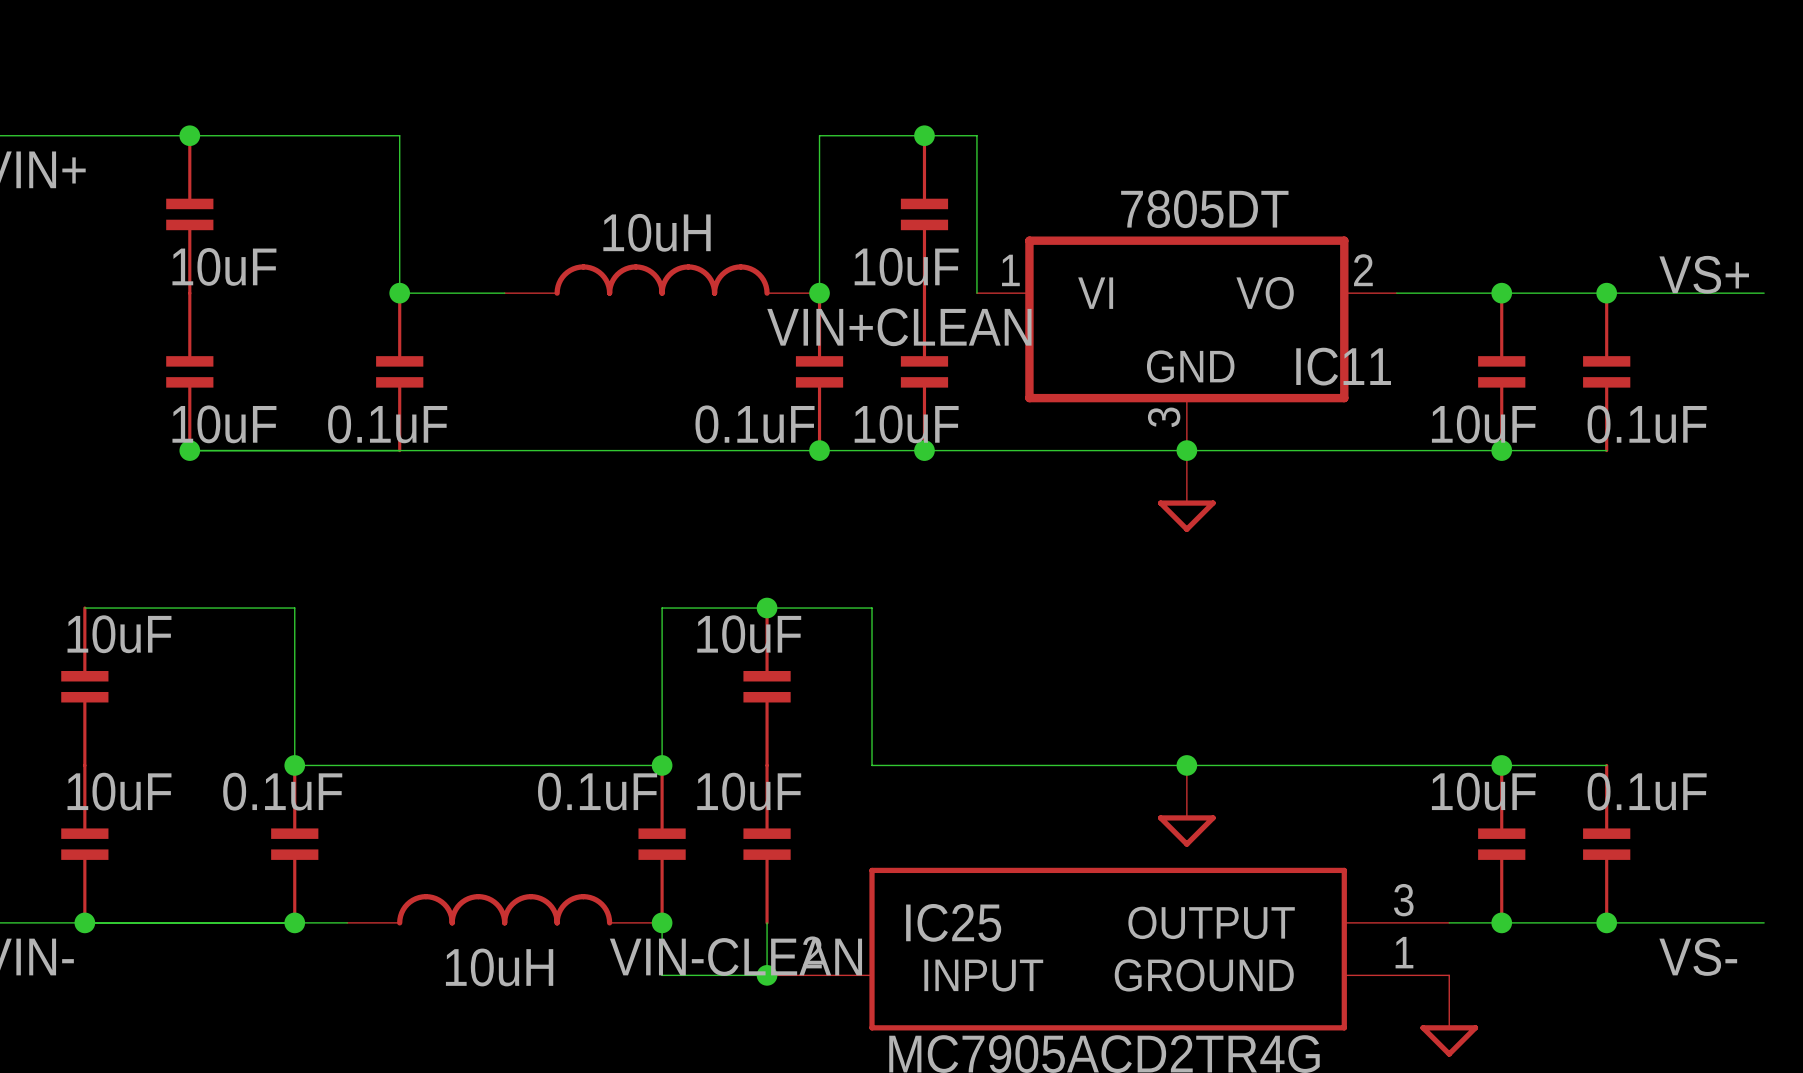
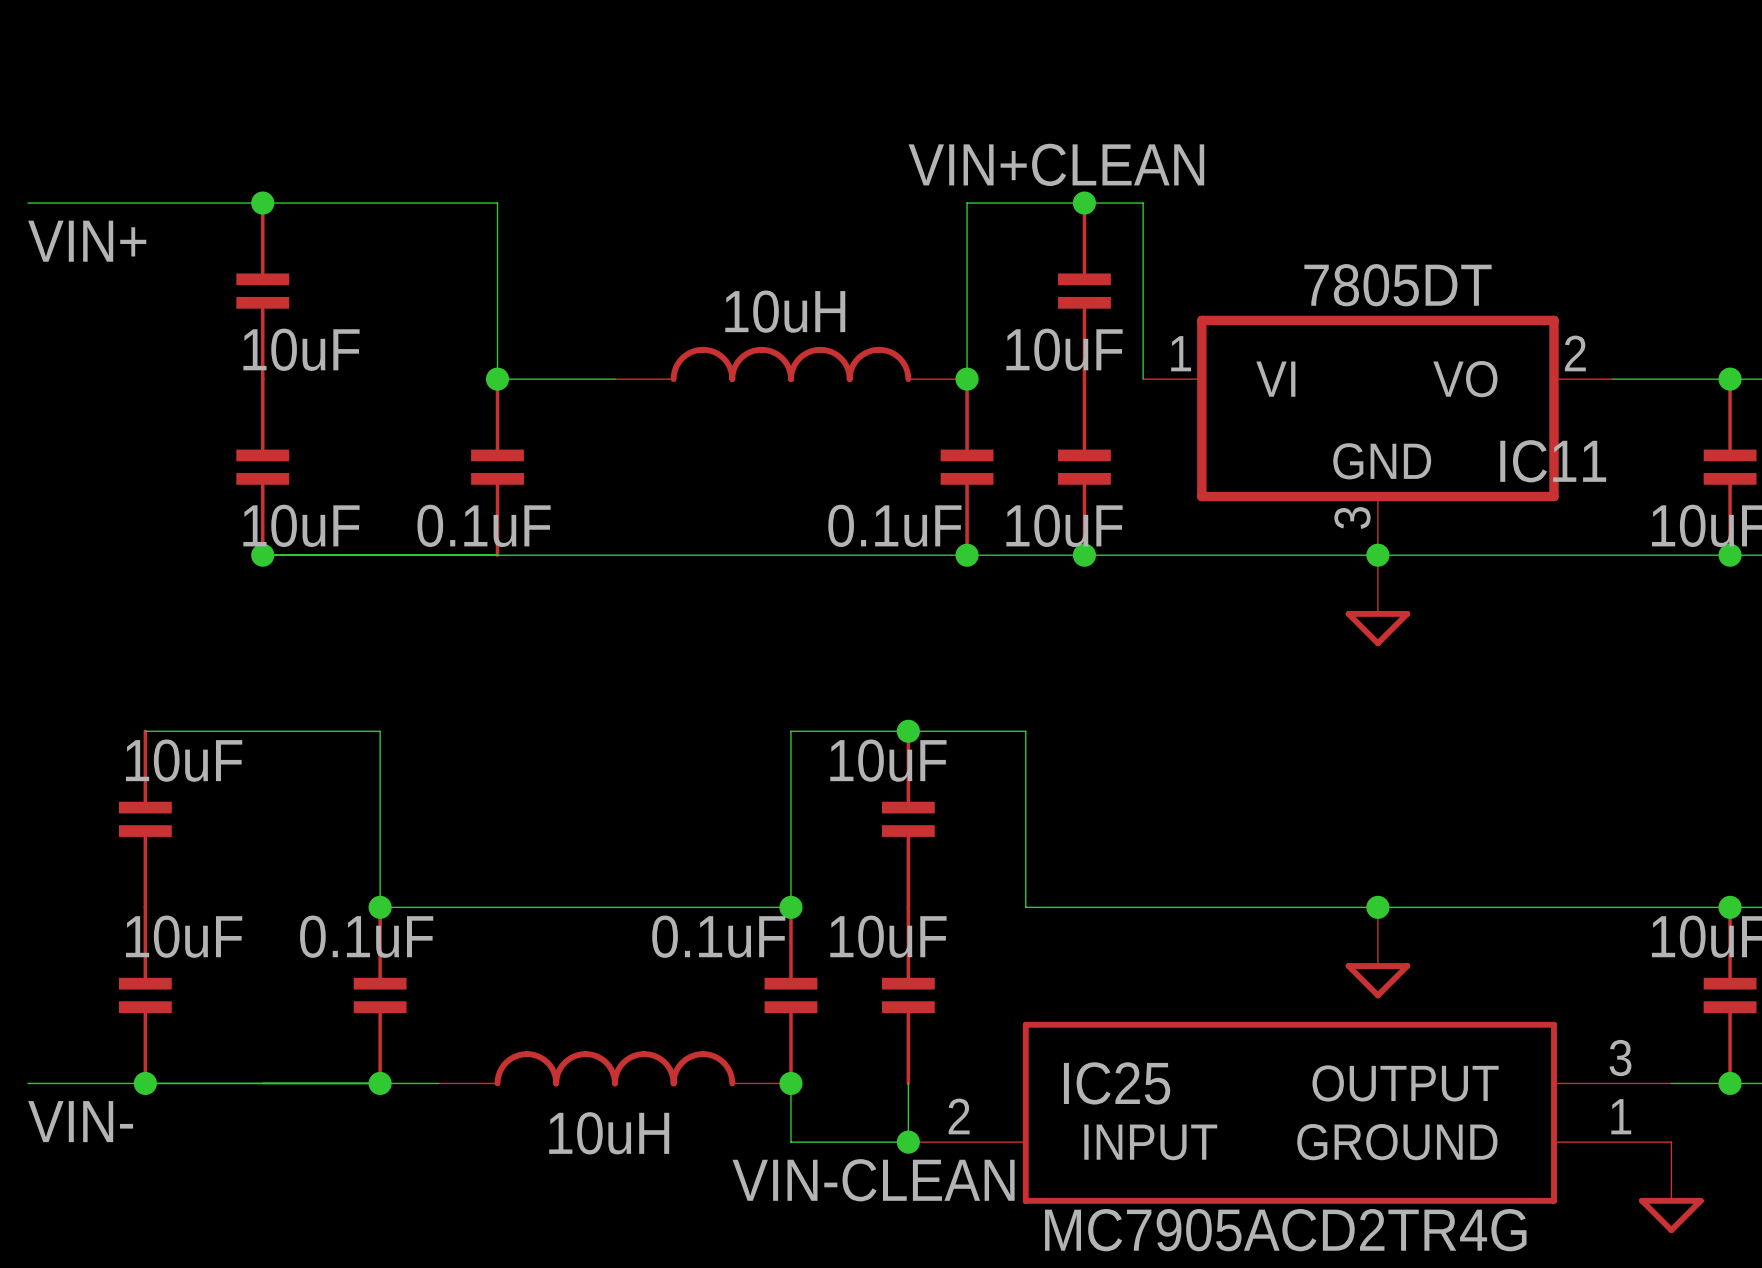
label position: VIN+CLEAN (899, 327) -> VIN+CLEAN (1056, 164)
label position: VIN-CLEAN (735, 956) -> VIN-CLEAN (873, 1180)

